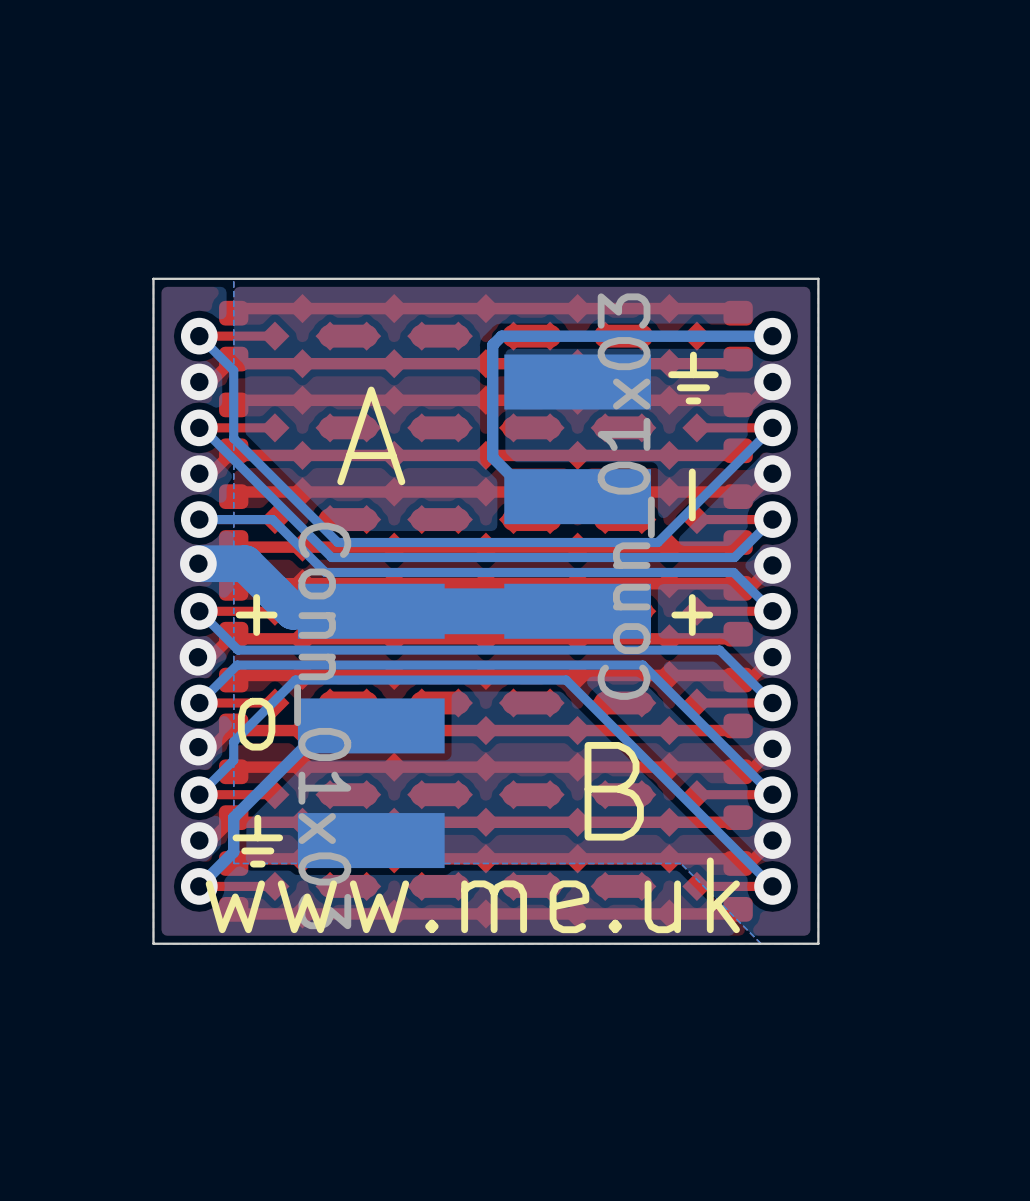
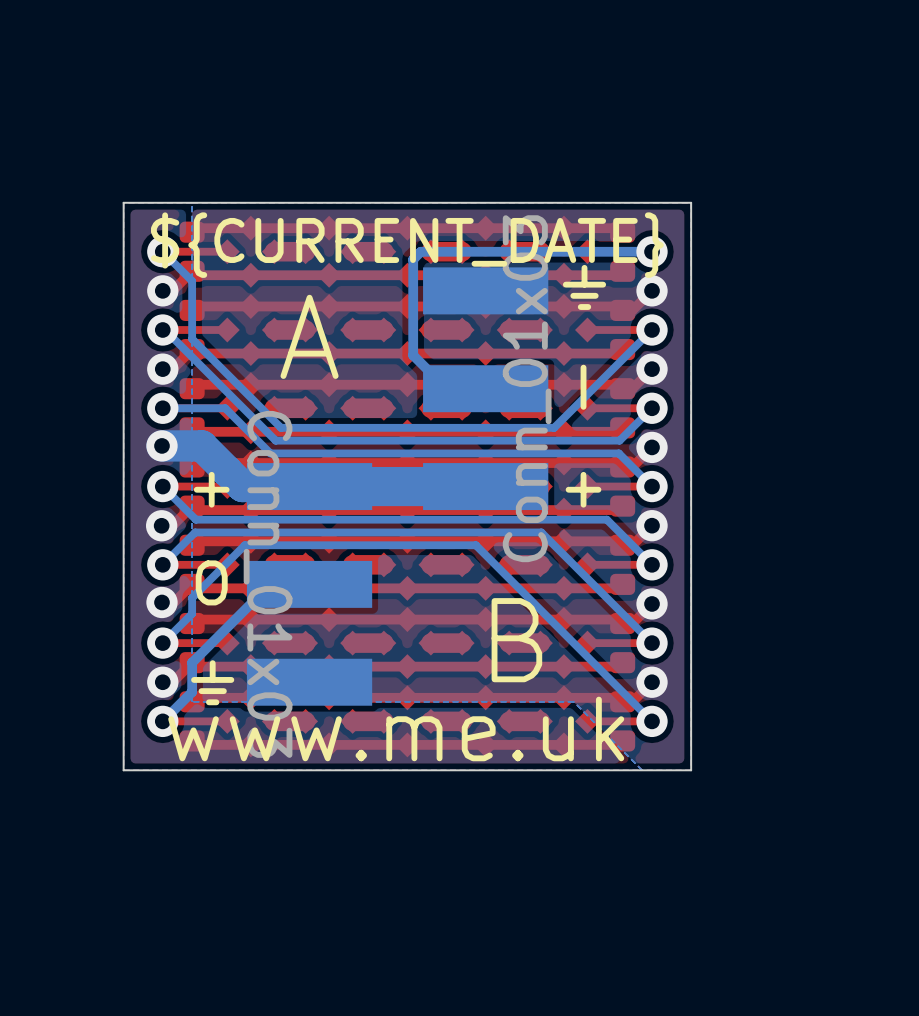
text: none -> ${CURRENT_DATE} (407, 245)

